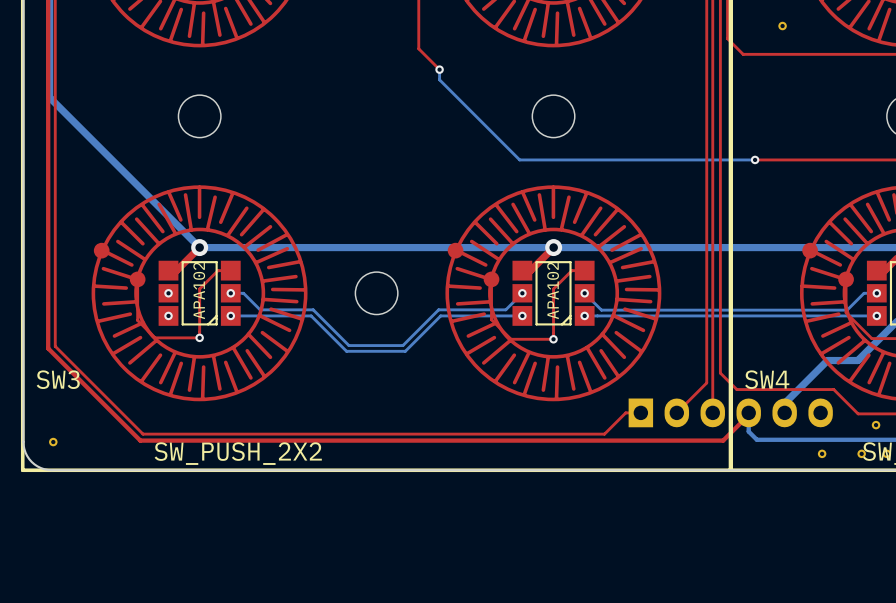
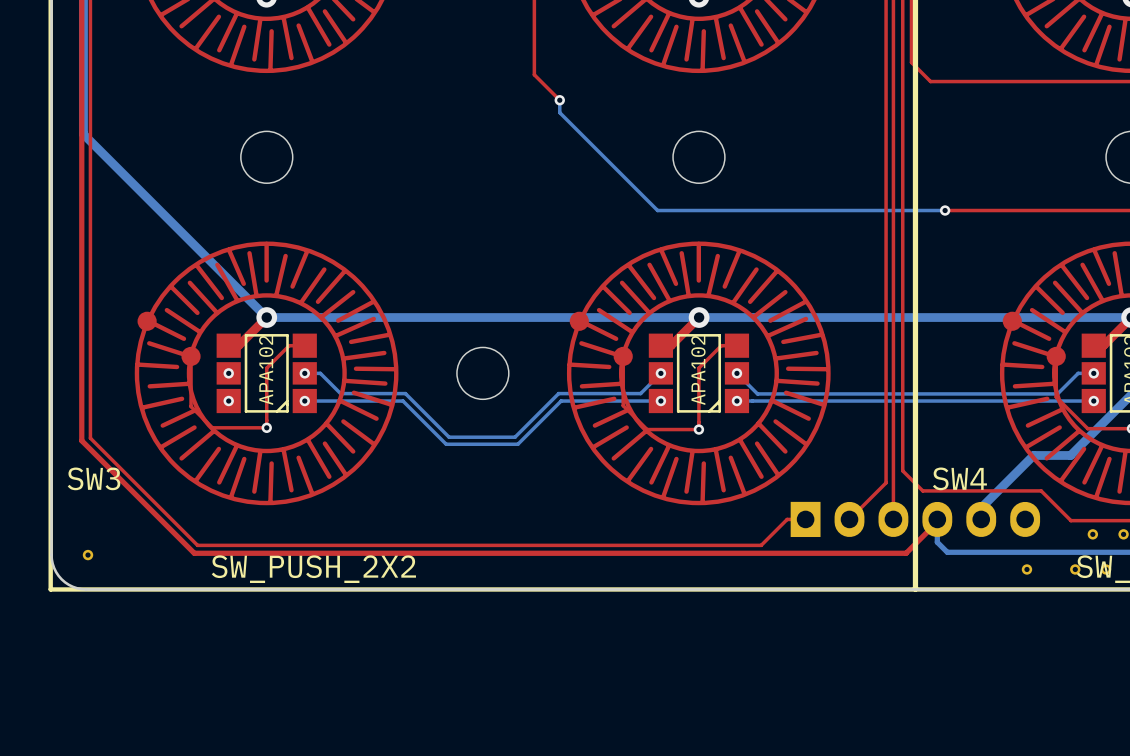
part: (782, 26) -> none

